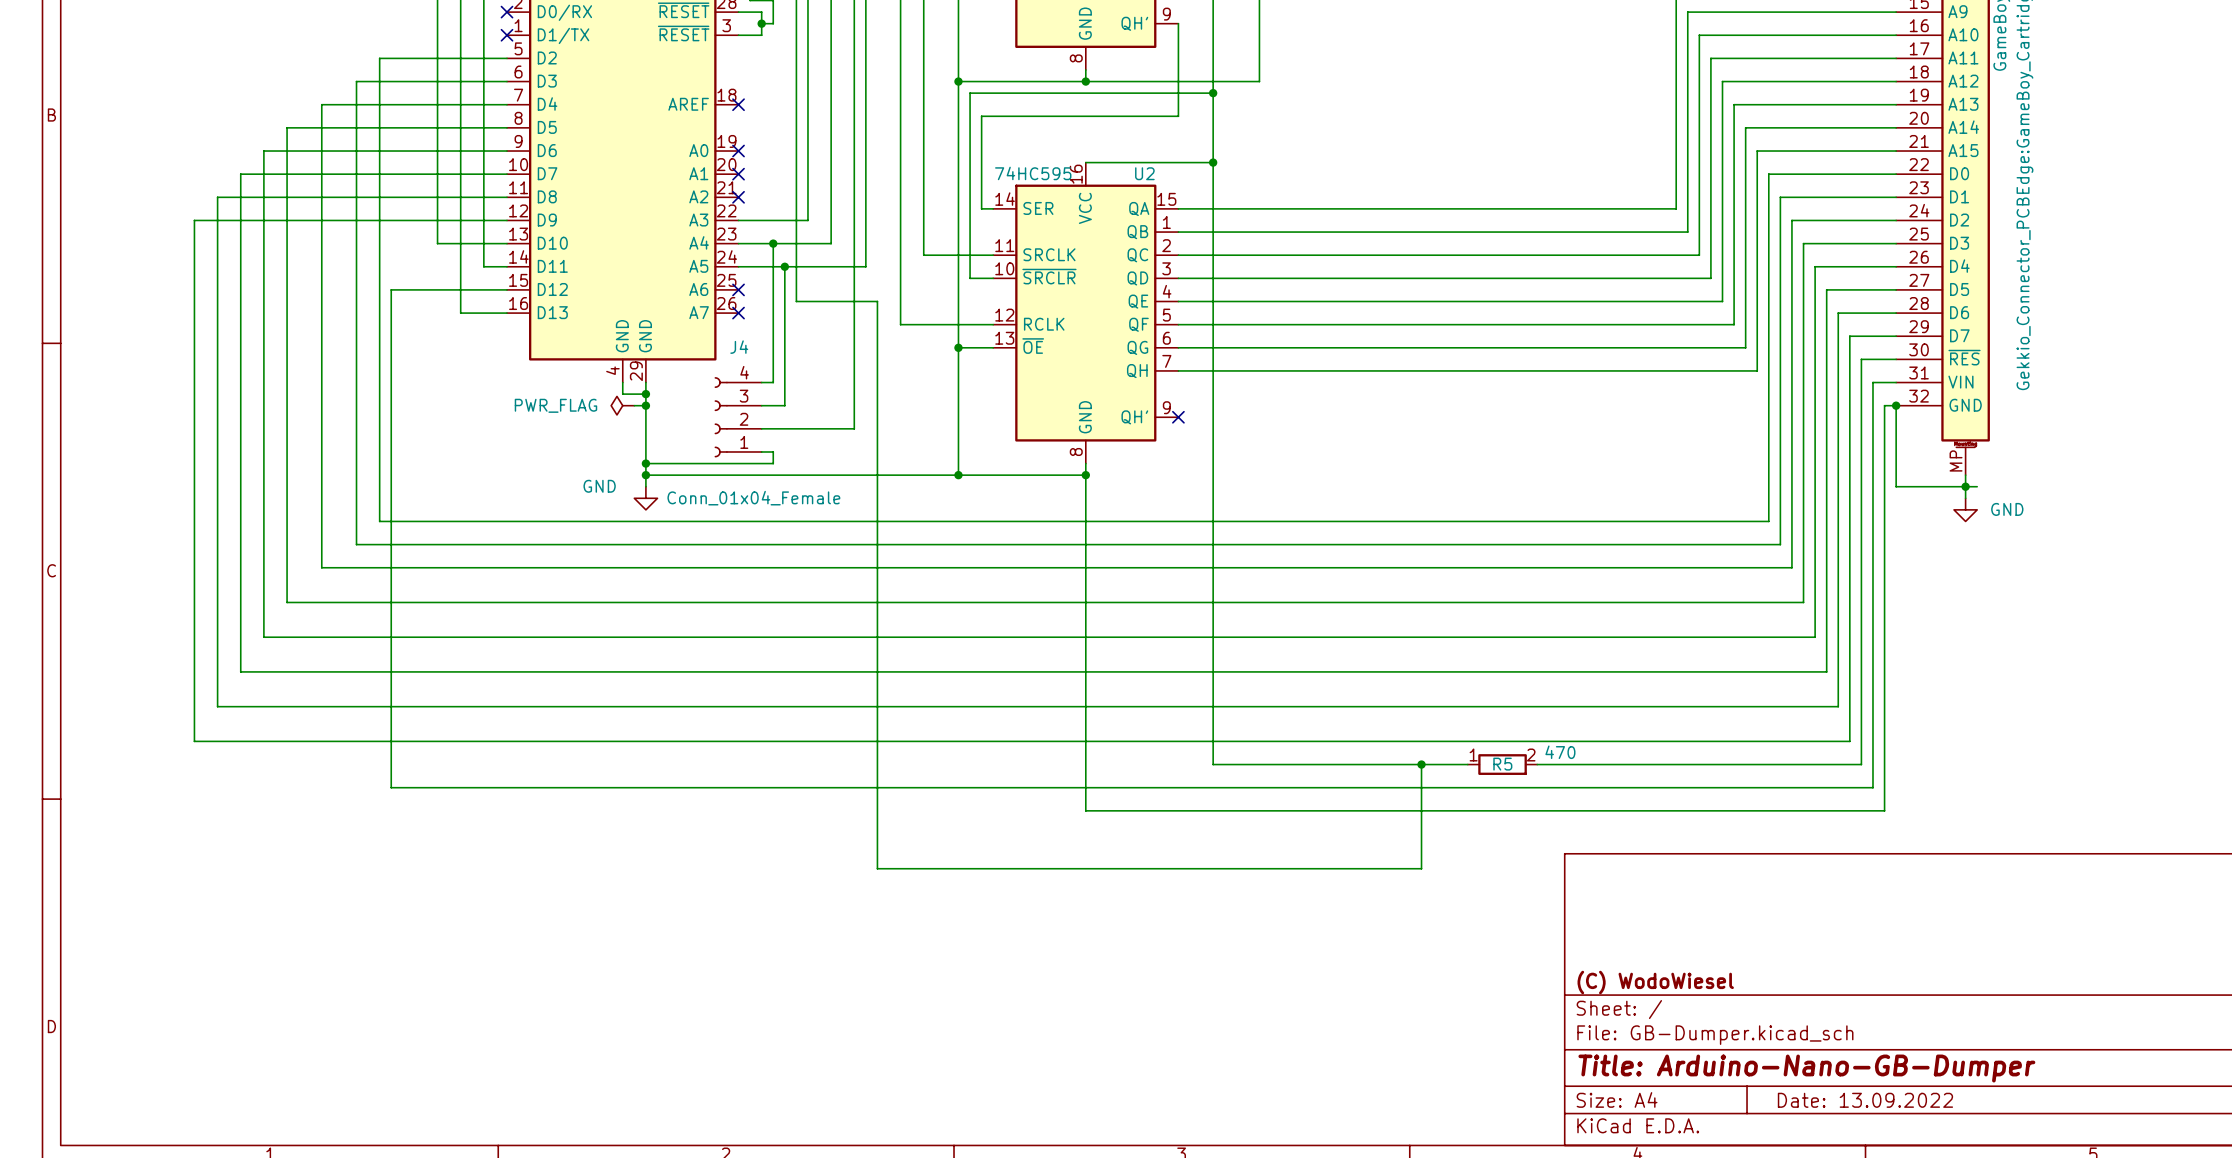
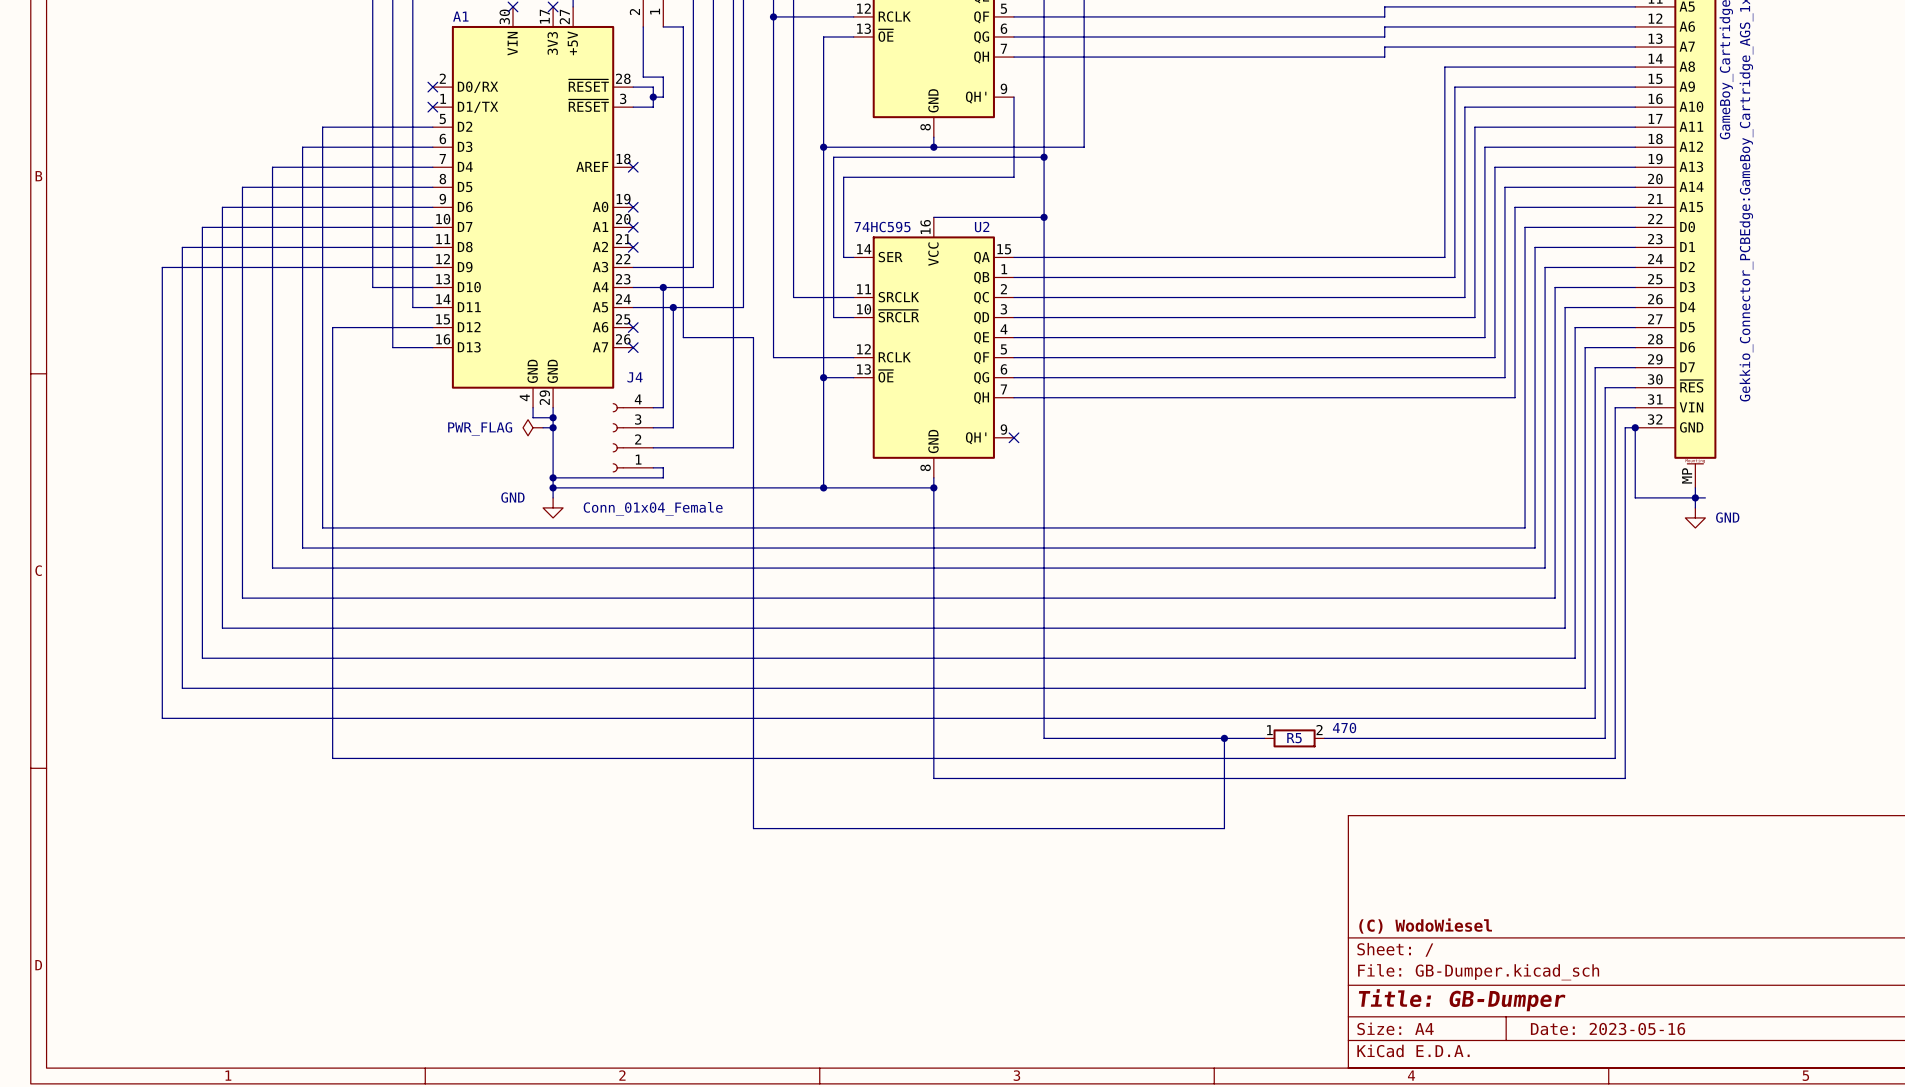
title block: Title: Arduino-Nano-GB-Dumper (1806, 1068) -> Title: GB-Dumper (1462, 1000)
title block: Date: 13.09.2022 (1865, 1100) -> Date: 2023-05-16 (1608, 1029)

